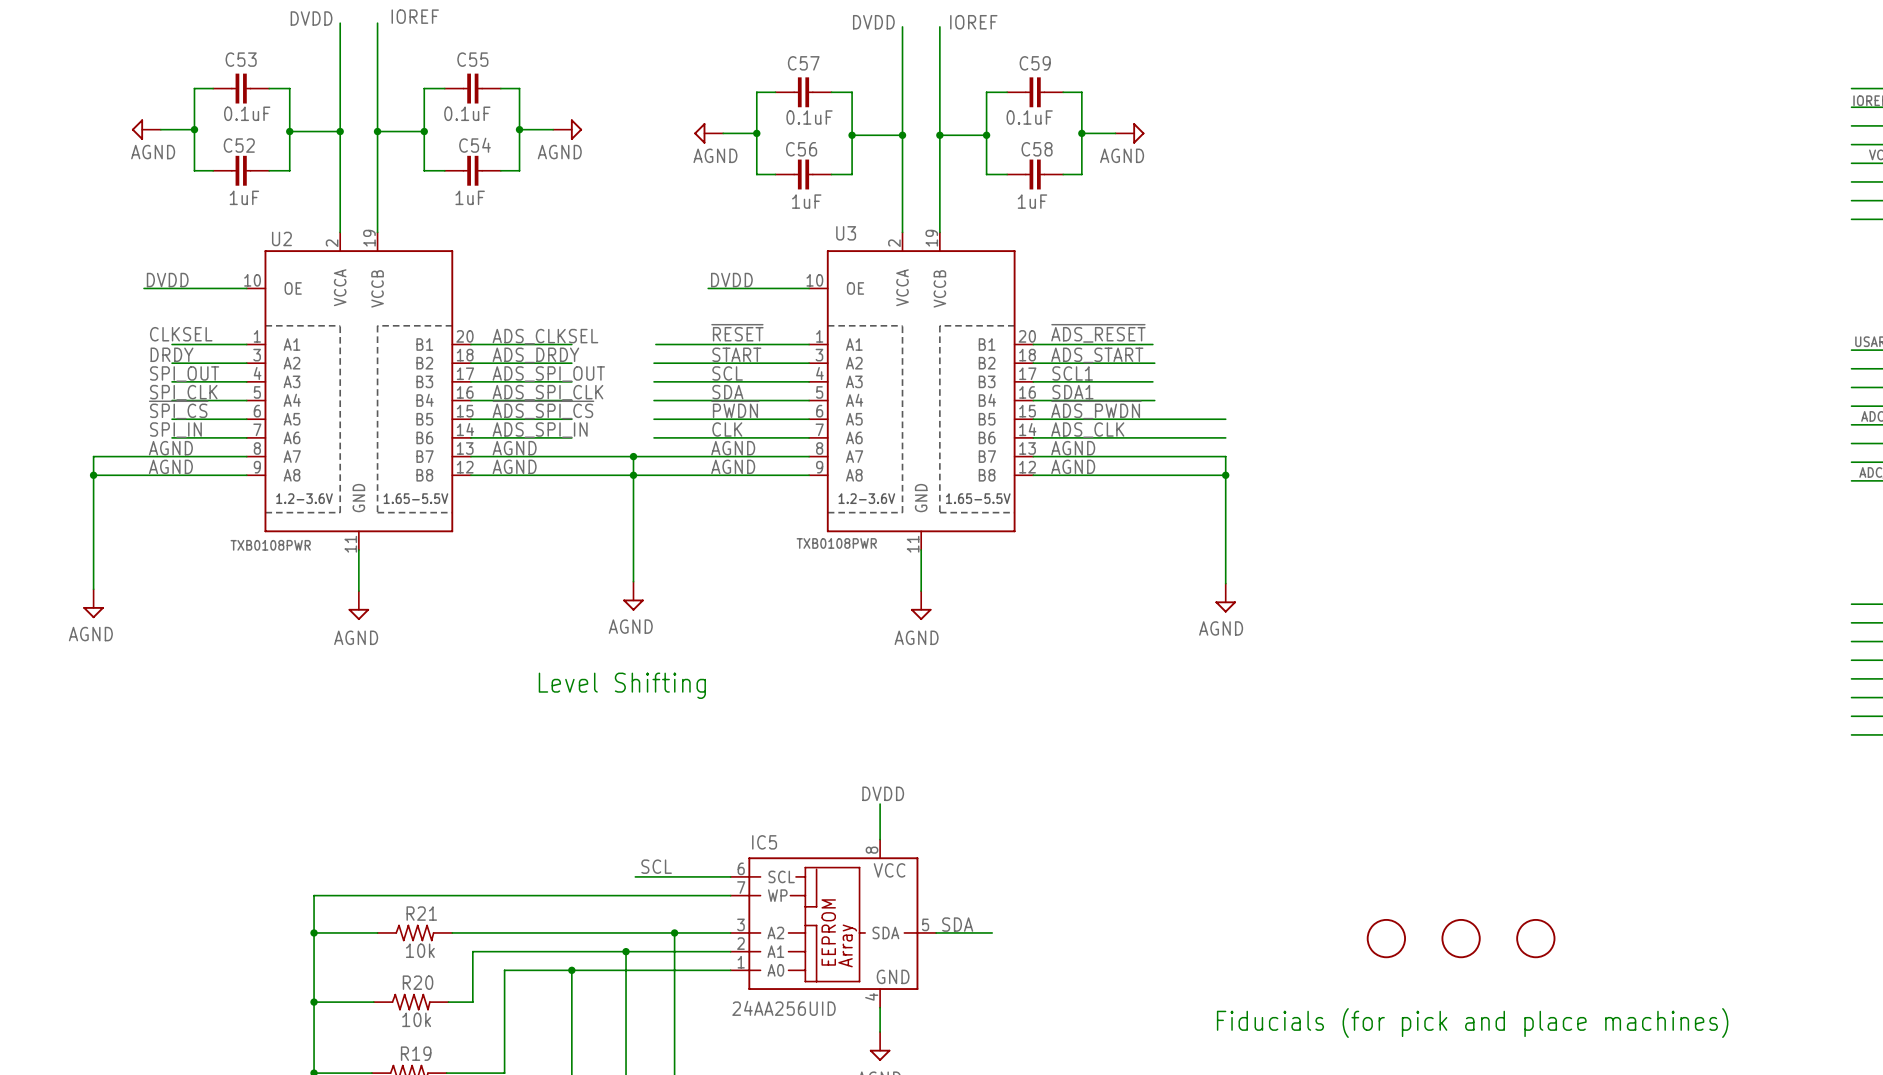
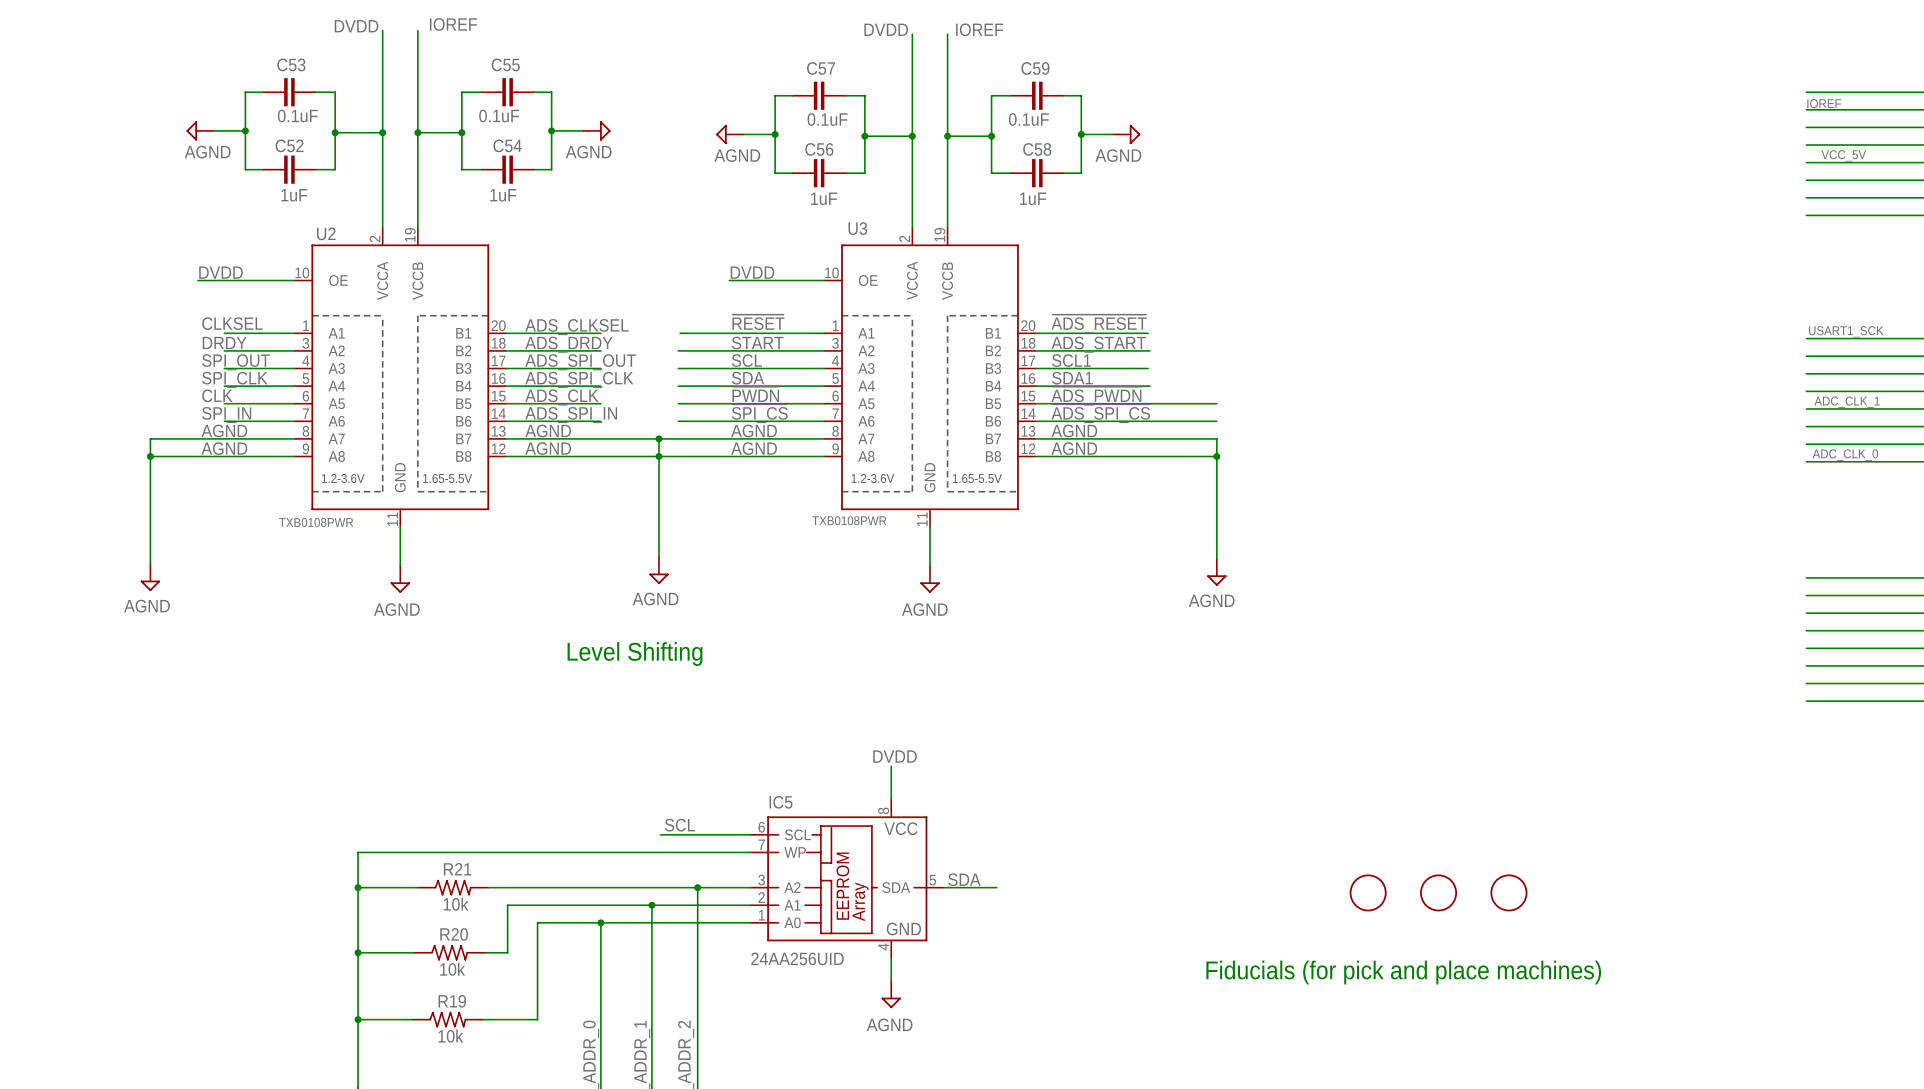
label: ~{SPI_CS} (178, 409) -> CLK (217, 395)
label: ~{ADS_SPI_CS} (543, 409) -> ADS_CLK (561, 397)
label: CLK (727, 429) -> ~{SPI_CS} (759, 413)
label: ADS_CLK (1087, 430) -> ~{ADS_SPI_CS} (1100, 413)

